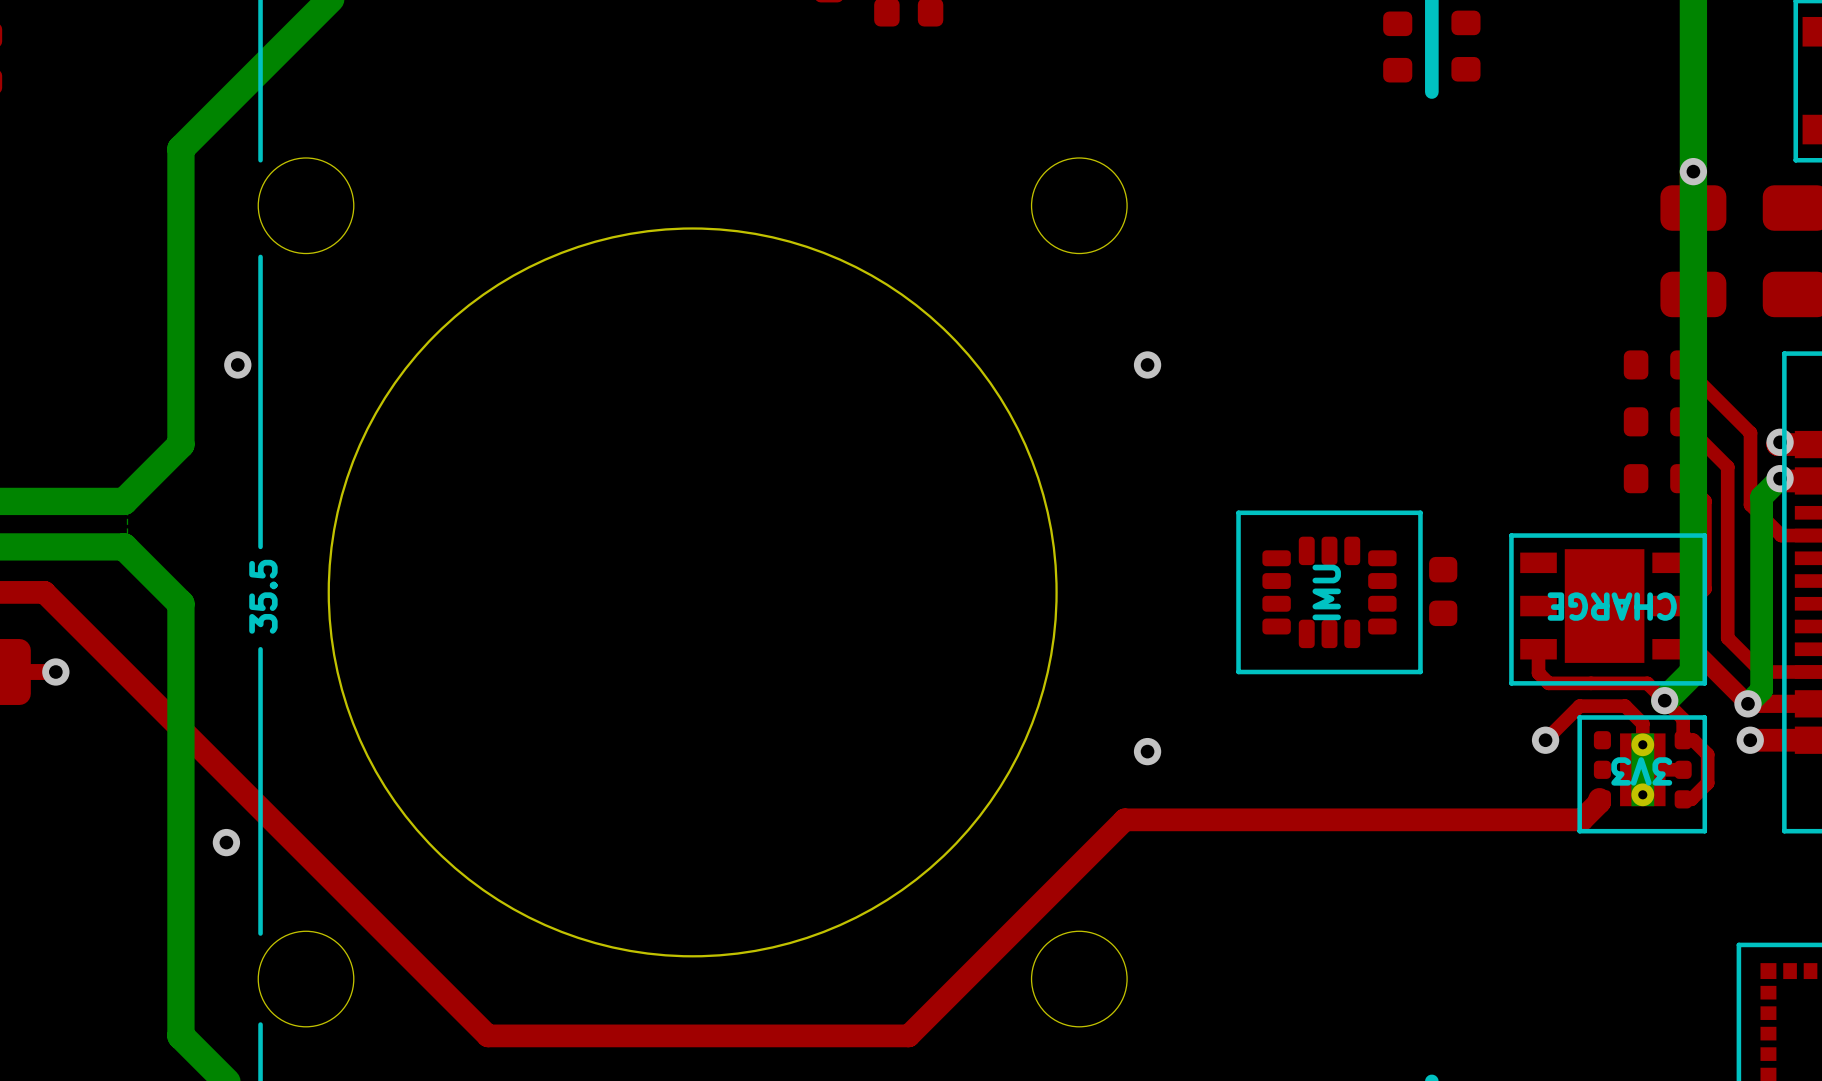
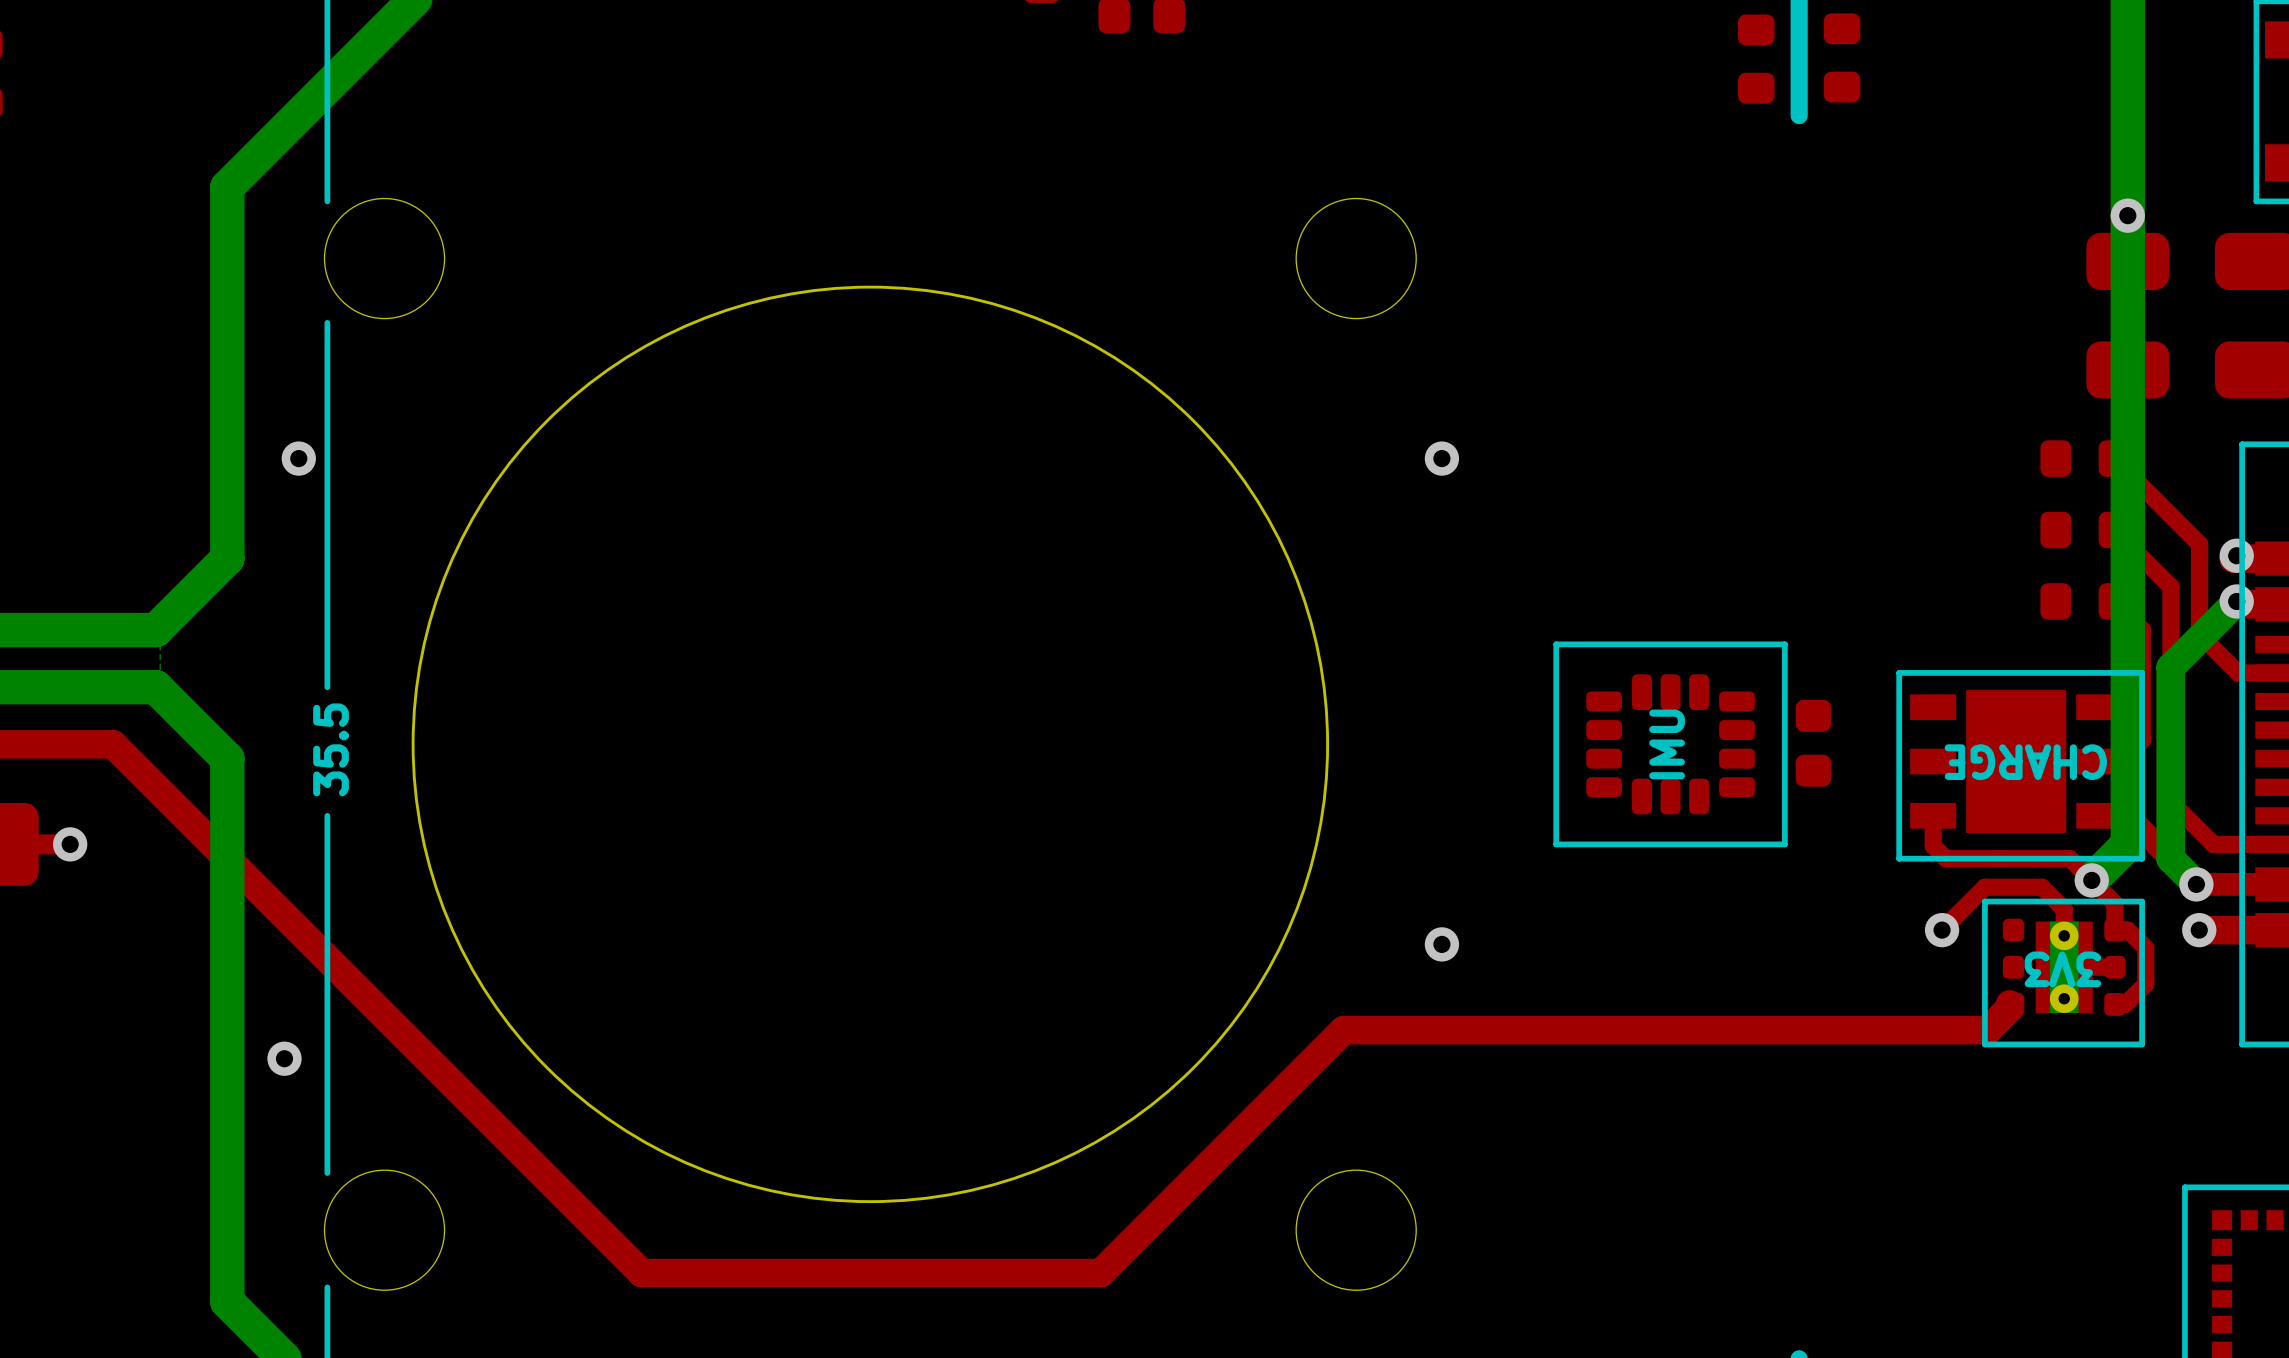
bottom track: (1761, 497) (1761, 690) (1747, 703) -> (2213, 624) (2170, 667) (2170, 858) (2196, 884)
top track: (44, 592) (487, 1035) (908, 1035) (1124, 819) -> (55, 744) (113, 744) (641, 1273) (1100, 1273) (1343, 1030) (1413, 1030)

